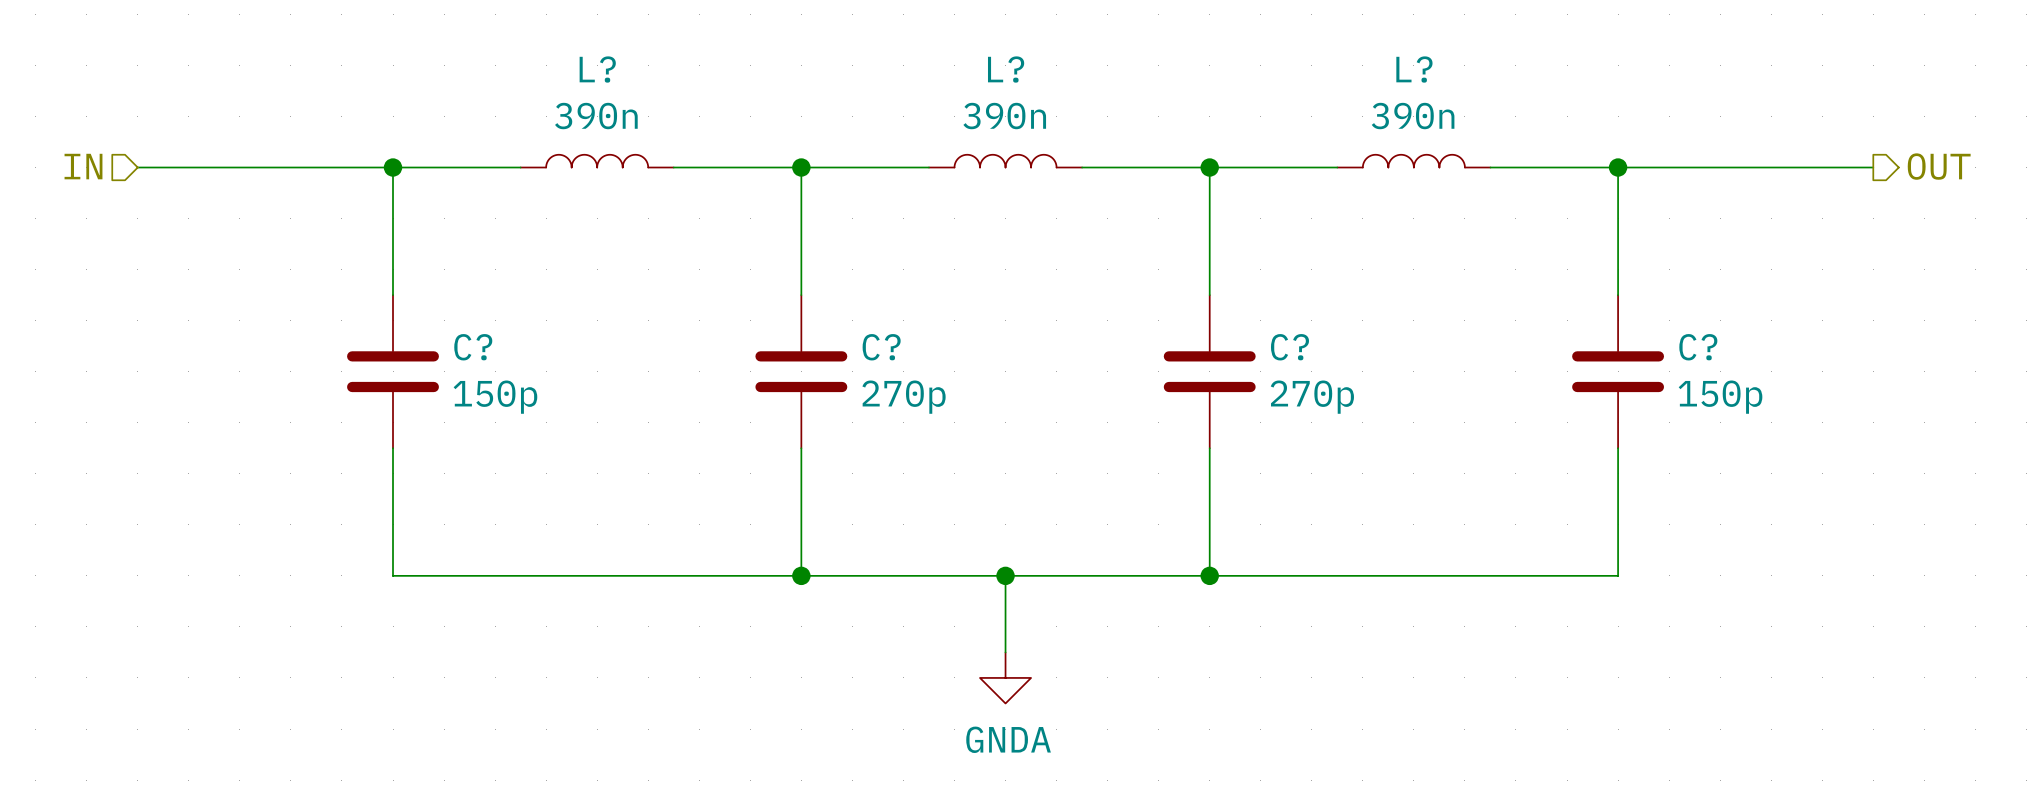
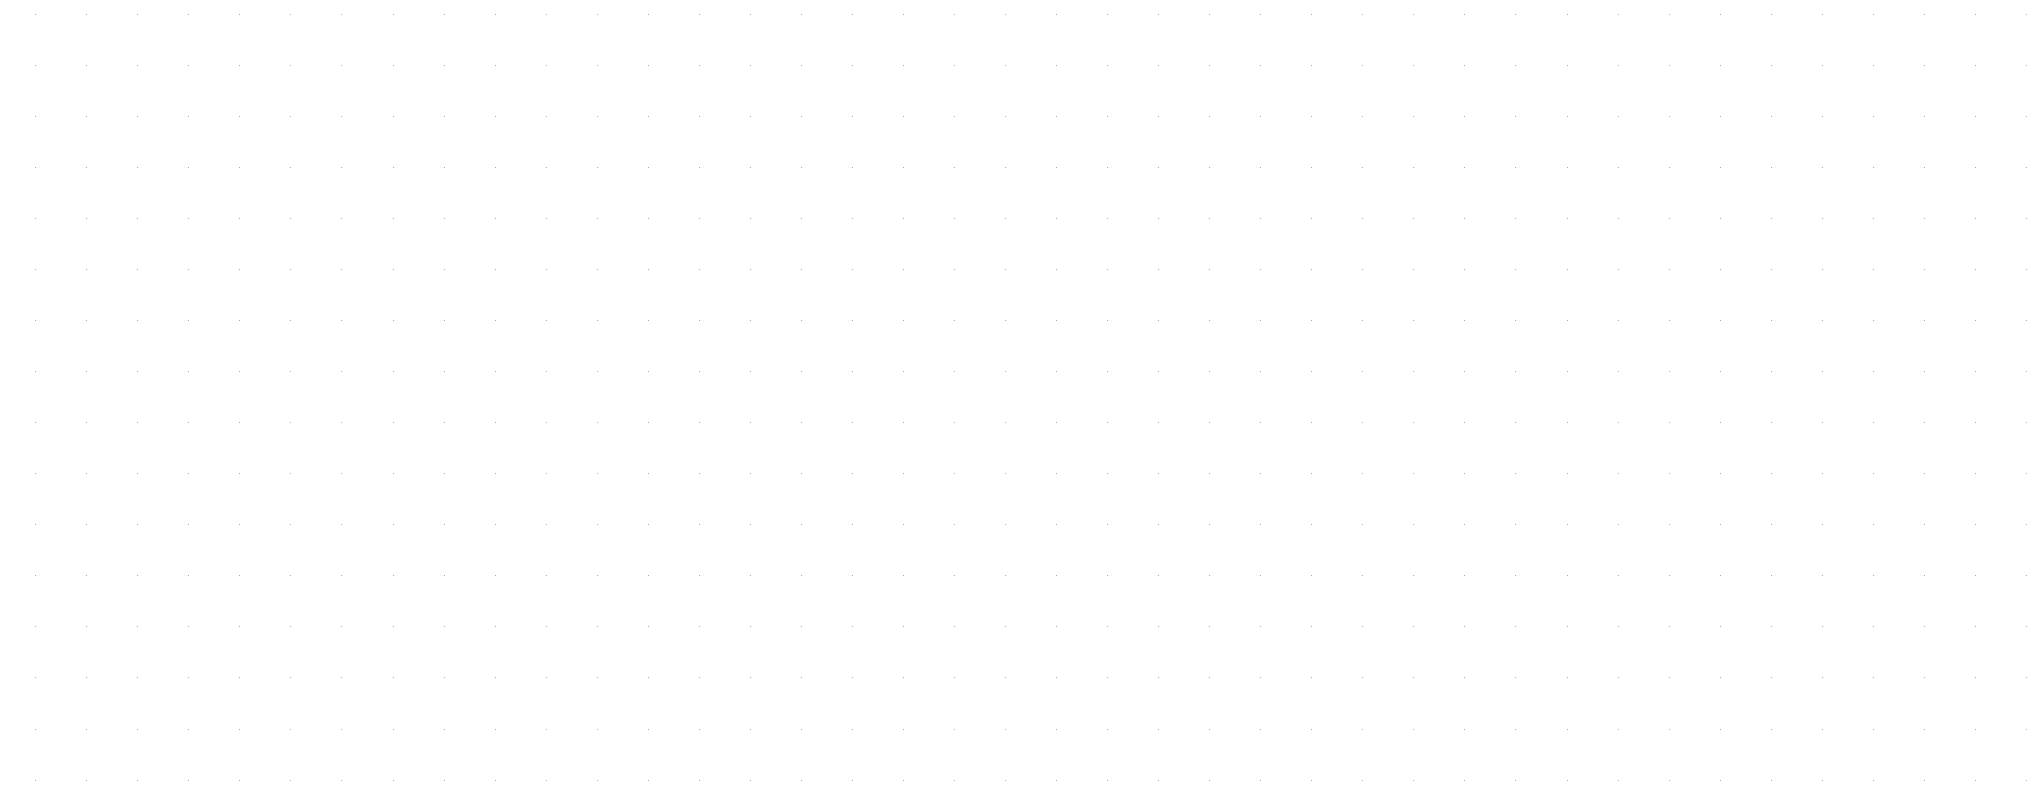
L?: 390n (597, 161) -> none
L?: 390n (1005, 161) -> none
L?: 390n (1413, 161) -> none
hierarchical label: IN (83, 166) -> none
hierarchical label: OUT (1939, 166) -> none
wire: (137, 167) (520, 167) -> none
wire: (393, 167) (393, 295) -> none
junction: (393, 167) -> none
wire: (673, 167) (928, 167) -> none
wire: (801, 167) (801, 295) -> none
junction: (801, 167) -> none
wire: (1082, 167) (1337, 167) -> none
wire: (1209, 167) (1209, 295) -> none
junction: (1209, 167) -> none
wire: (1490, 167) (1873, 167) -> none
wire: (1618, 167) (1618, 295) -> none
junction: (1618, 167) -> none
C?: 150p (393, 371) -> none
C?: 270p (801, 371) -> none
C?: 270p (1209, 371) -> none
C?: 150p (1618, 371) -> none
wire: (393, 448) (393, 575) (1618, 575) (1618, 448) -> none
wire: (801, 448) (801, 575) -> none
wire: (1209, 448) (1209, 575) -> none
junction: (801, 575) -> none
wire: (1005, 575) (1005, 652) -> none
junction: (1005, 575) -> none
junction: (1209, 575) -> none
power symbol: GNDA (1005, 677) -> none

